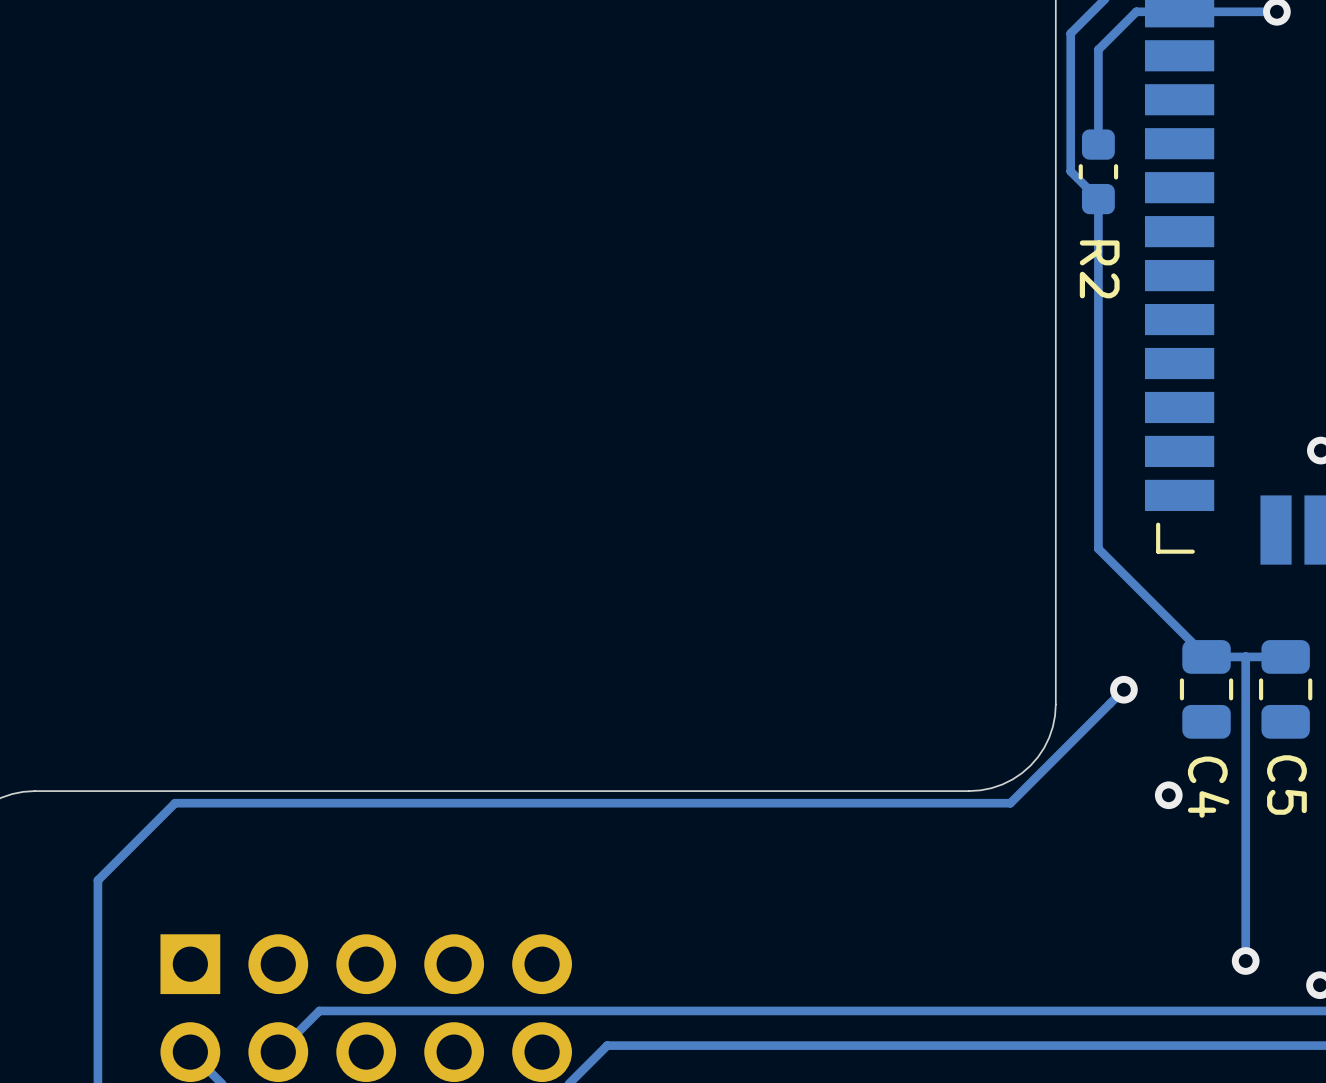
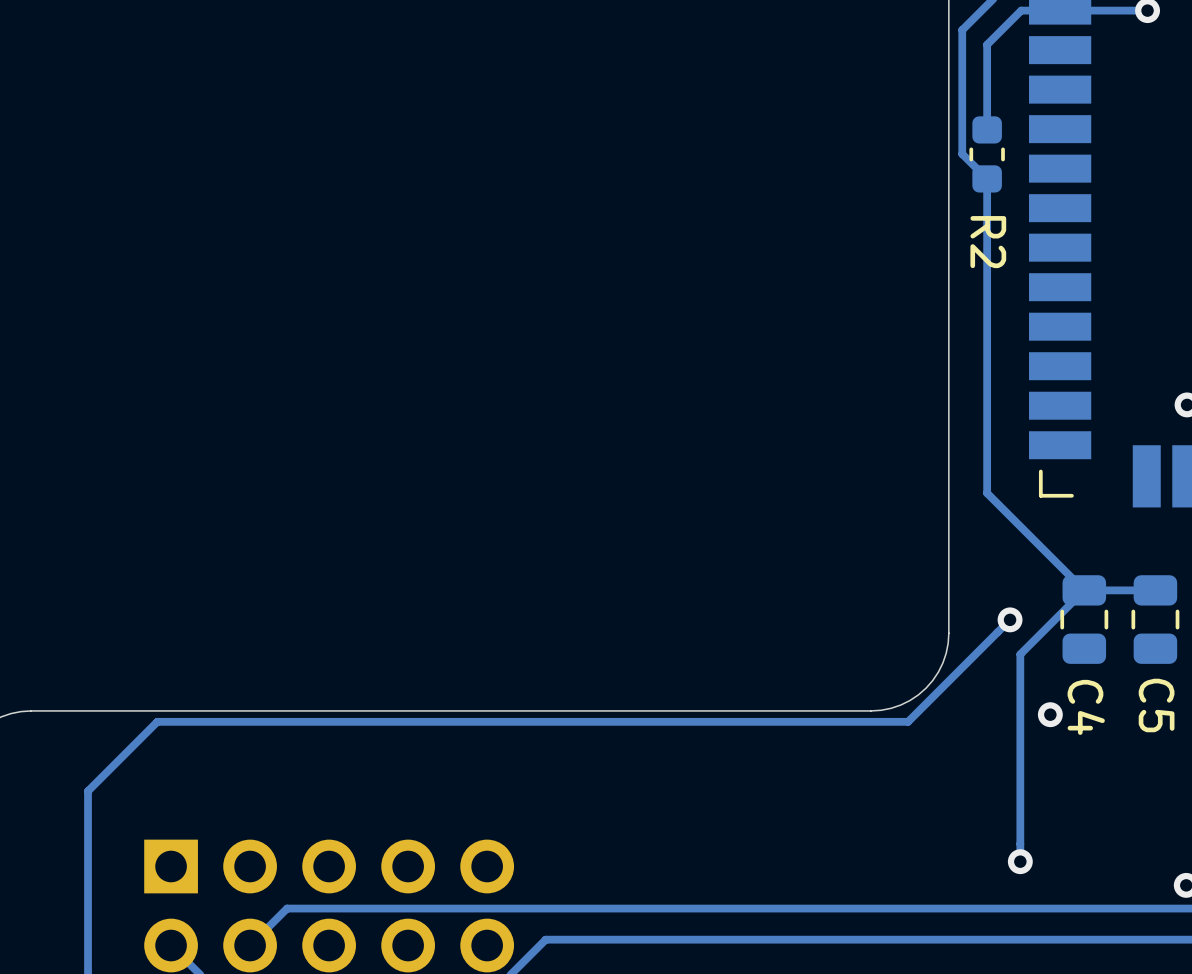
track: none -> (1084, 590) (1020, 654) (1020, 861)
track: (1245, 656) (1245, 961) -> none
via position: (1245, 961) -> (1020, 861)

